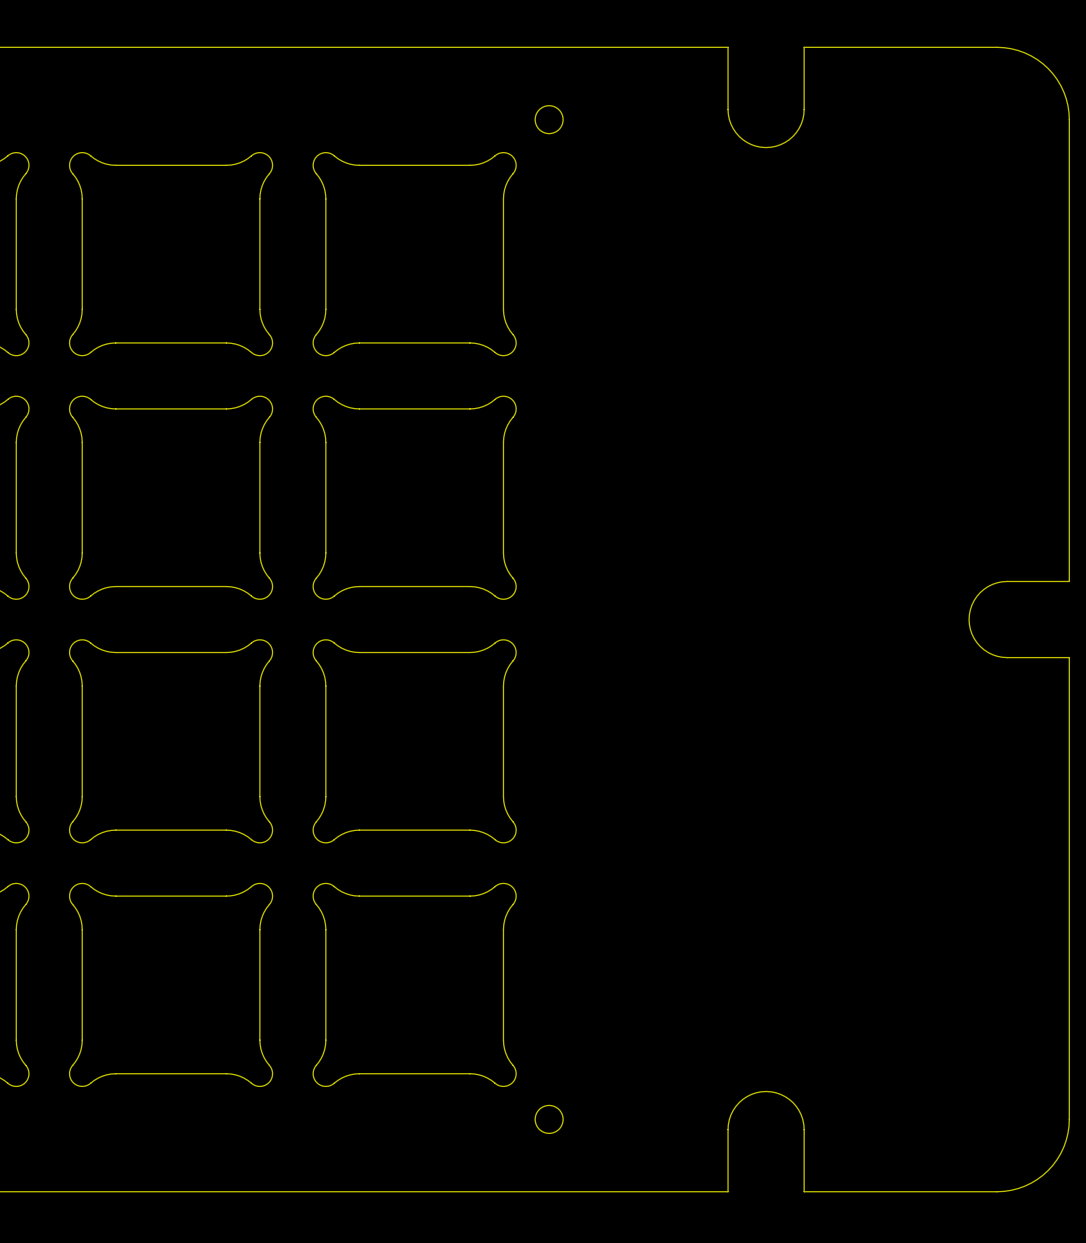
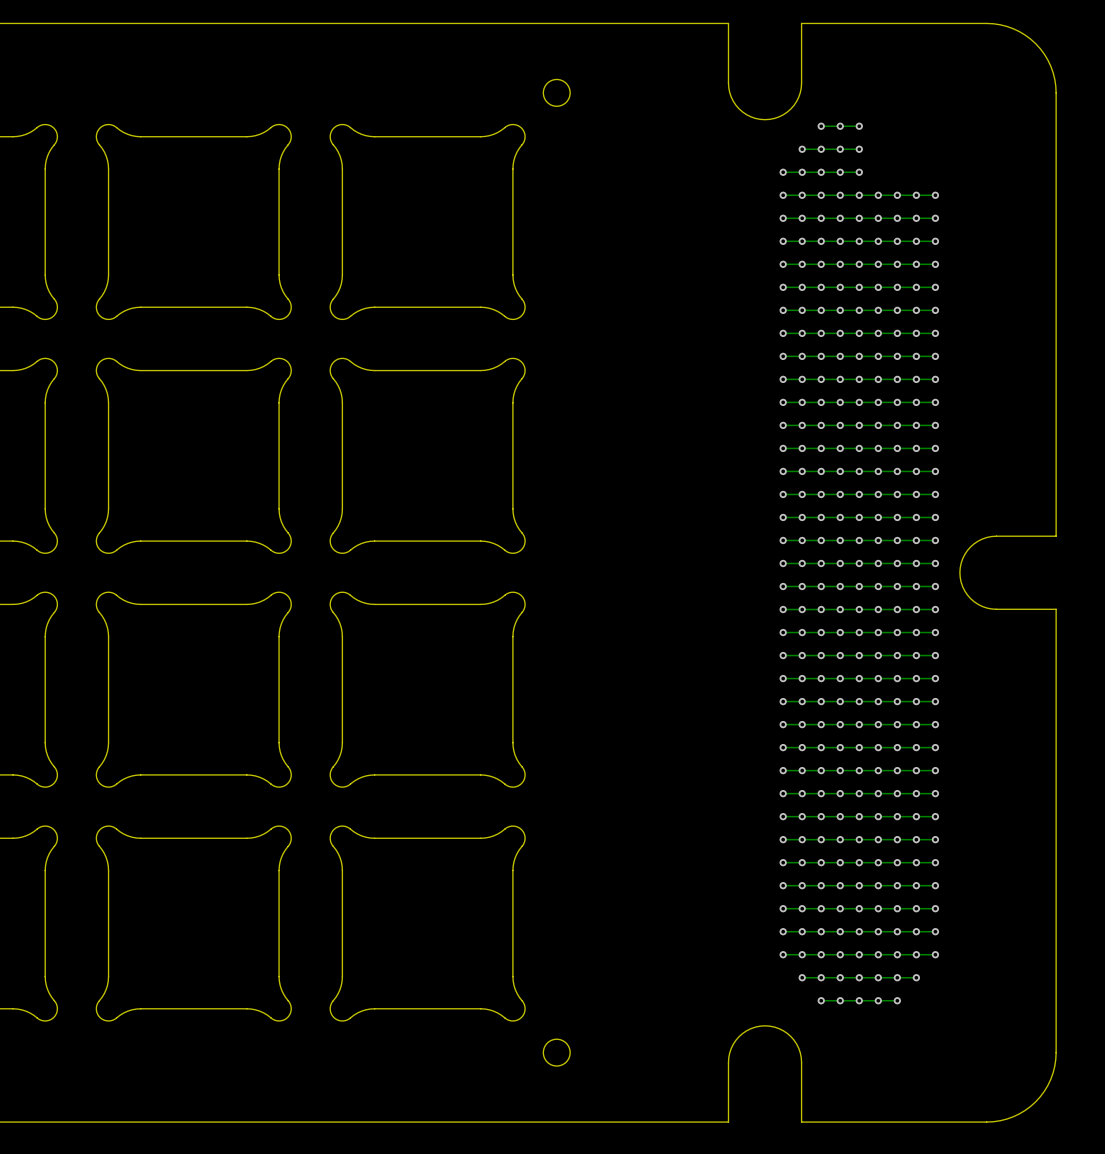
via: none -> (821, 126)
via: none -> (840, 126)
track: none -> (859, 126) (821, 126)
via: none -> (859, 126)
via: none -> (802, 149)
via: none -> (821, 149)
via: none -> (840, 149)
track: none -> (859, 149) (802, 149)
via: none -> (859, 149)
via: none -> (783, 172)
via: none -> (802, 172)
via: none -> (821, 172)
via: none -> (840, 172)
track: none -> (859, 172) (783, 172)
via: none -> (859, 172)
via: none -> (783, 195)
via: none -> (802, 195)
via: none -> (821, 195)
via: none -> (840, 195)
via: none -> (859, 195)
via: none -> (878, 195)
via: none -> (897, 195)
via: none -> (916, 195)
track: none -> (935, 195) (783, 195)
via: none -> (935, 195)
via: none -> (783, 218)
via: none -> (802, 218)
via: none -> (821, 218)
via: none -> (840, 218)
via: none -> (859, 218)
via: none -> (878, 218)
via: none -> (897, 218)
via: none -> (916, 218)
track: none -> (935, 218) (783, 218)
via: none -> (935, 218)
via: none -> (783, 241)
via: none -> (802, 241)
via: none -> (821, 241)
via: none -> (840, 241)
via: none -> (859, 241)
via: none -> (878, 241)
via: none -> (897, 241)
via: none -> (916, 241)
track: none -> (935, 241) (783, 241)
via: none -> (935, 241)
via: none -> (783, 264)
via: none -> (802, 264)
via: none -> (821, 264)
via: none -> (840, 264)
via: none -> (859, 264)
via: none -> (878, 264)
via: none -> (897, 264)
via: none -> (916, 264)
track: none -> (935, 264) (783, 264)
via: none -> (935, 264)
via: none -> (783, 287)
via: none -> (802, 287)
via: none -> (821, 287)
via: none -> (840, 287)
via: none -> (859, 287)
via: none -> (878, 287)
via: none -> (897, 287)
via: none -> (916, 287)
track: none -> (935, 287) (783, 287)
via: none -> (935, 287)
via: none -> (783, 310)
via: none -> (802, 310)
via: none -> (821, 310)
via: none -> (840, 310)
via: none -> (859, 310)
via: none -> (878, 310)
via: none -> (897, 310)
via: none -> (916, 310)
track: none -> (935, 310) (783, 310)
via: none -> (935, 310)
via: none -> (783, 333)
via: none -> (802, 333)
via: none -> (821, 333)
via: none -> (840, 333)
via: none -> (859, 333)
via: none -> (878, 333)
via: none -> (897, 333)
via: none -> (916, 333)
track: none -> (935, 333) (783, 333)
via: none -> (935, 333)
via: none -> (783, 356)
via: none -> (802, 356)
via: none -> (821, 356)
via: none -> (840, 356)
via: none -> (859, 356)
via: none -> (878, 356)
via: none -> (897, 356)
via: none -> (916, 356)
track: none -> (935, 356) (783, 356)
via: none -> (935, 356)
via: none -> (783, 379)
via: none -> (802, 379)
via: none -> (821, 379)
via: none -> (840, 379)
via: none -> (859, 379)
via: none -> (878, 379)
via: none -> (897, 379)
via: none -> (916, 379)
track: none -> (935, 379) (783, 379)
via: none -> (935, 379)
via: none -> (783, 402)
via: none -> (802, 402)
via: none -> (821, 402)
via: none -> (840, 402)
via: none -> (859, 402)
via: none -> (878, 402)
via: none -> (897, 402)
via: none -> (916, 402)
track: none -> (935, 402) (783, 402)
via: none -> (935, 402)
via: none -> (783, 425)
via: none -> (802, 425)
via: none -> (821, 425)
via: none -> (840, 425)
via: none -> (859, 425)
via: none -> (878, 425)
via: none -> (897, 425)
via: none -> (916, 425)
track: none -> (935, 425) (783, 425)
via: none -> (935, 425)
via: none -> (783, 448)
via: none -> (802, 448)
via: none -> (821, 448)
via: none -> (840, 448)
via: none -> (859, 448)
via: none -> (878, 448)
via: none -> (897, 448)
via: none -> (916, 448)
track: none -> (935, 448) (783, 448)
via: none -> (935, 448)
via: none -> (783, 471)
via: none -> (802, 471)
via: none -> (821, 471)
via: none -> (840, 471)
via: none -> (859, 471)
via: none -> (878, 471)
via: none -> (897, 471)
via: none -> (916, 471)
track: none -> (935, 471) (783, 471)
via: none -> (935, 471)
via: none -> (783, 494)
via: none -> (802, 494)
via: none -> (821, 494)
via: none -> (840, 494)
via: none -> (859, 494)
via: none -> (878, 494)
via: none -> (897, 494)
via: none -> (916, 494)
track: none -> (935, 494) (783, 494)
via: none -> (935, 494)
via: none -> (783, 517)
via: none -> (802, 517)
via: none -> (821, 517)
via: none -> (840, 517)
via: none -> (859, 517)
via: none -> (878, 517)
via: none -> (897, 517)
via: none -> (916, 517)
track: none -> (935, 517) (783, 517)
via: none -> (935, 517)
via: none -> (783, 540)
via: none -> (802, 540)
via: none -> (821, 540)
via: none -> (840, 540)
via: none -> (859, 540)
via: none -> (878, 540)
via: none -> (897, 540)
via: none -> (916, 540)
track: none -> (935, 540) (783, 540)
via: none -> (935, 540)
via: none -> (783, 563)
via: none -> (802, 563)
via: none -> (821, 563)
via: none -> (840, 563)
via: none -> (859, 563)
via: none -> (878, 563)
via: none -> (897, 563)
via: none -> (916, 563)
track: none -> (935, 563) (783, 563)
via: none -> (935, 563)
via: none -> (783, 586)
via: none -> (802, 586)
via: none -> (821, 586)
via: none -> (840, 586)
via: none -> (859, 586)
via: none -> (878, 586)
via: none -> (897, 586)
via: none -> (916, 586)
track: none -> (935, 586) (783, 586)
via: none -> (935, 586)
via: none -> (783, 609)
via: none -> (802, 609)
via: none -> (821, 609)
via: none -> (840, 609)
via: none -> (859, 609)
via: none -> (878, 609)
via: none -> (897, 609)
via: none -> (916, 609)
track: none -> (935, 609) (783, 609)
via: none -> (935, 609)
via: none -> (783, 632)
via: none -> (802, 632)
via: none -> (821, 632)
via: none -> (840, 632)
via: none -> (859, 632)
via: none -> (878, 632)
via: none -> (897, 632)
via: none -> (916, 632)
track: none -> (935, 632) (783, 632)
via: none -> (935, 632)
via: none -> (783, 655)
via: none -> (802, 655)
via: none -> (821, 655)
via: none -> (840, 655)
via: none -> (859, 655)
via: none -> (878, 655)
via: none -> (897, 655)
via: none -> (916, 655)
track: none -> (935, 655) (783, 655)
via: none -> (935, 655)
via: none -> (783, 678)
via: none -> (802, 678)
via: none -> (821, 678)
via: none -> (840, 678)
via: none -> (859, 678)
via: none -> (878, 678)
via: none -> (897, 678)
via: none -> (916, 678)
track: none -> (935, 678) (783, 678)
via: none -> (935, 678)
via: none -> (783, 701)
via: none -> (802, 701)
via: none -> (821, 701)
via: none -> (840, 701)
via: none -> (859, 701)
via: none -> (878, 701)
via: none -> (897, 701)
via: none -> (916, 701)
track: none -> (935, 701) (783, 701)
via: none -> (935, 701)
via: none -> (783, 724)
via: none -> (802, 724)
via: none -> (821, 724)
via: none -> (840, 724)
via: none -> (859, 724)
via: none -> (878, 724)
via: none -> (897, 724)
via: none -> (916, 724)
track: none -> (935, 724) (783, 724)
via: none -> (935, 724)
via: none -> (783, 747)
via: none -> (802, 747)
via: none -> (821, 747)
via: none -> (840, 747)
via: none -> (859, 747)
via: none -> (878, 747)
via: none -> (897, 747)
via: none -> (916, 747)
track: none -> (935, 747) (783, 747)
via: none -> (935, 747)
via: none -> (783, 770)
via: none -> (802, 770)
via: none -> (821, 770)
via: none -> (840, 770)
via: none -> (859, 770)
via: none -> (878, 770)
via: none -> (897, 770)
via: none -> (916, 770)
track: none -> (935, 770) (783, 770)
via: none -> (935, 770)
via: none -> (783, 793)
via: none -> (802, 793)
via: none -> (821, 793)
via: none -> (840, 793)
via: none -> (859, 793)
via: none -> (878, 793)
via: none -> (897, 793)
via: none -> (916, 793)
track: none -> (935, 793) (783, 793)
via: none -> (935, 793)
via: none -> (783, 816)
via: none -> (802, 816)
via: none -> (821, 816)
via: none -> (840, 816)
via: none -> (859, 816)
via: none -> (878, 816)
via: none -> (897, 816)
via: none -> (916, 816)
track: none -> (935, 816) (783, 816)
via: none -> (935, 816)
via: none -> (783, 839)
via: none -> (802, 839)
via: none -> (821, 839)
via: none -> (840, 839)
via: none -> (859, 839)
via: none -> (878, 839)
via: none -> (897, 839)
via: none -> (916, 839)
track: none -> (935, 839) (783, 839)
via: none -> (935, 839)
via: none -> (783, 862)
via: none -> (802, 862)
via: none -> (821, 862)
via: none -> (840, 862)
via: none -> (859, 862)
via: none -> (878, 862)
via: none -> (897, 862)
via: none -> (916, 862)
track: none -> (935, 862) (783, 862)
via: none -> (935, 862)
via: none -> (783, 885)
via: none -> (802, 885)
via: none -> (821, 885)
via: none -> (840, 885)
via: none -> (859, 885)
via: none -> (878, 885)
via: none -> (897, 885)
via: none -> (916, 885)
track: none -> (935, 885) (783, 885)
via: none -> (935, 885)
via: none -> (783, 908)
via: none -> (802, 908)
via: none -> (821, 908)
via: none -> (840, 908)
via: none -> (859, 908)
via: none -> (878, 908)
via: none -> (897, 908)
via: none -> (916, 908)
track: none -> (935, 908) (783, 908)
via: none -> (935, 908)
via: none -> (783, 931)
via: none -> (802, 931)
via: none -> (821, 931)
via: none -> (840, 931)
via: none -> (859, 931)
via: none -> (878, 931)
via: none -> (897, 931)
via: none -> (916, 931)
track: none -> (935, 931) (783, 931)
via: none -> (935, 931)
via: none -> (783, 954)
via: none -> (802, 954)
via: none -> (821, 954)
via: none -> (840, 954)
via: none -> (859, 954)
via: none -> (878, 954)
via: none -> (897, 954)
via: none -> (916, 954)
track: none -> (935, 954) (783, 954)
via: none -> (935, 954)
via: none -> (802, 977)
via: none -> (821, 977)
via: none -> (840, 977)
via: none -> (859, 977)
via: none -> (878, 977)
via: none -> (897, 977)
track: none -> (916, 977) (802, 977)
via: none -> (916, 977)
via: none -> (821, 1000)
via: none -> (840, 1000)
via: none -> (859, 1000)
via: none -> (878, 1000)
track: none -> (897, 1000) (821, 1000)
via: none -> (897, 1000)

